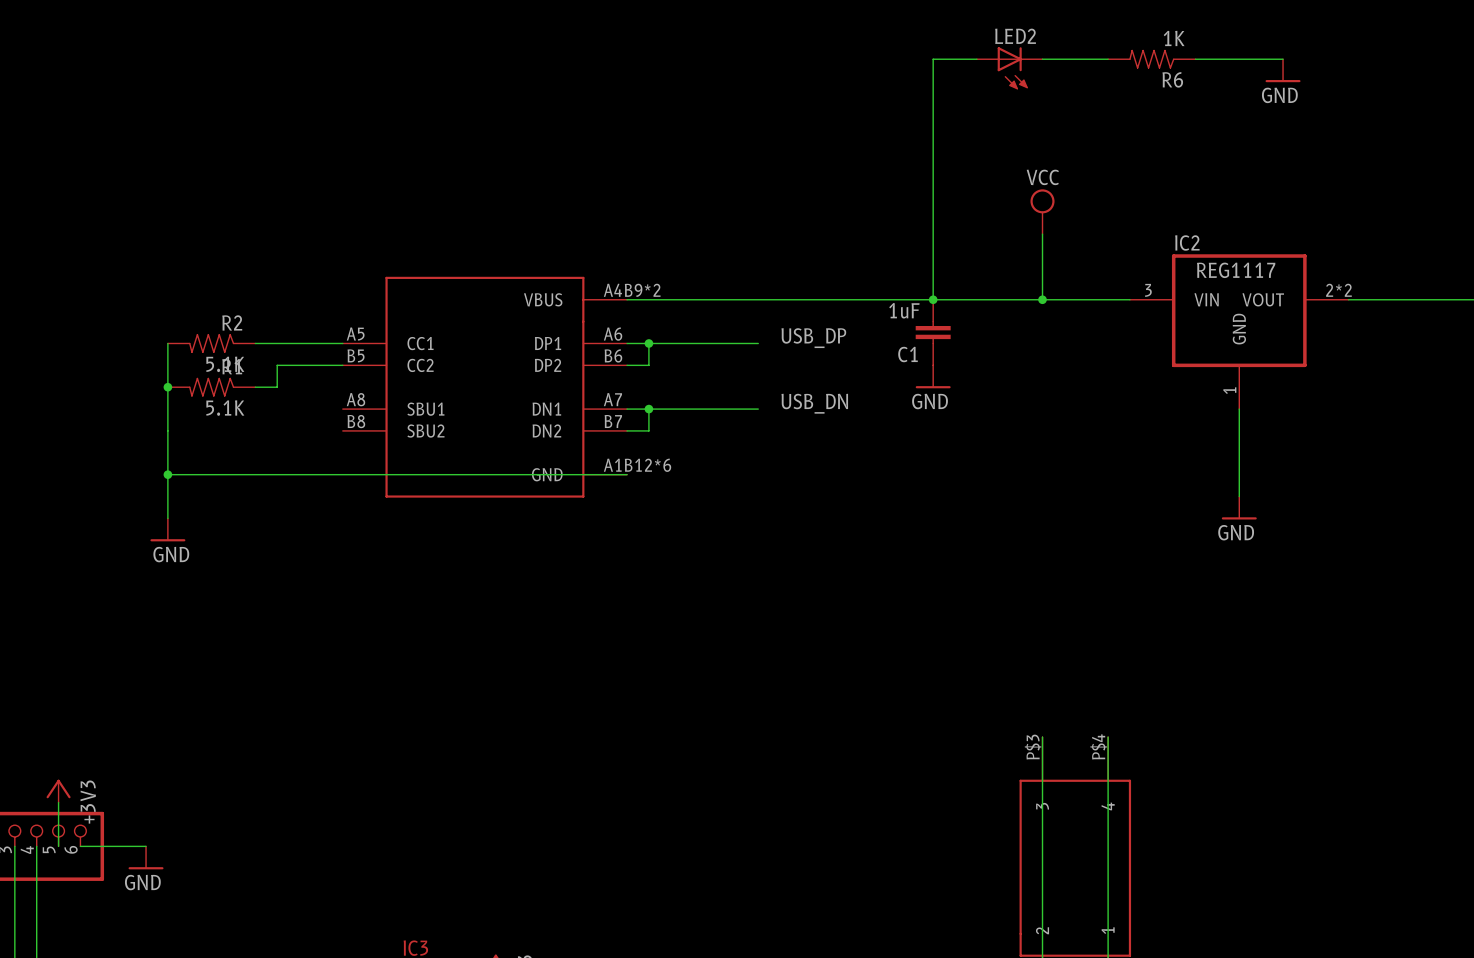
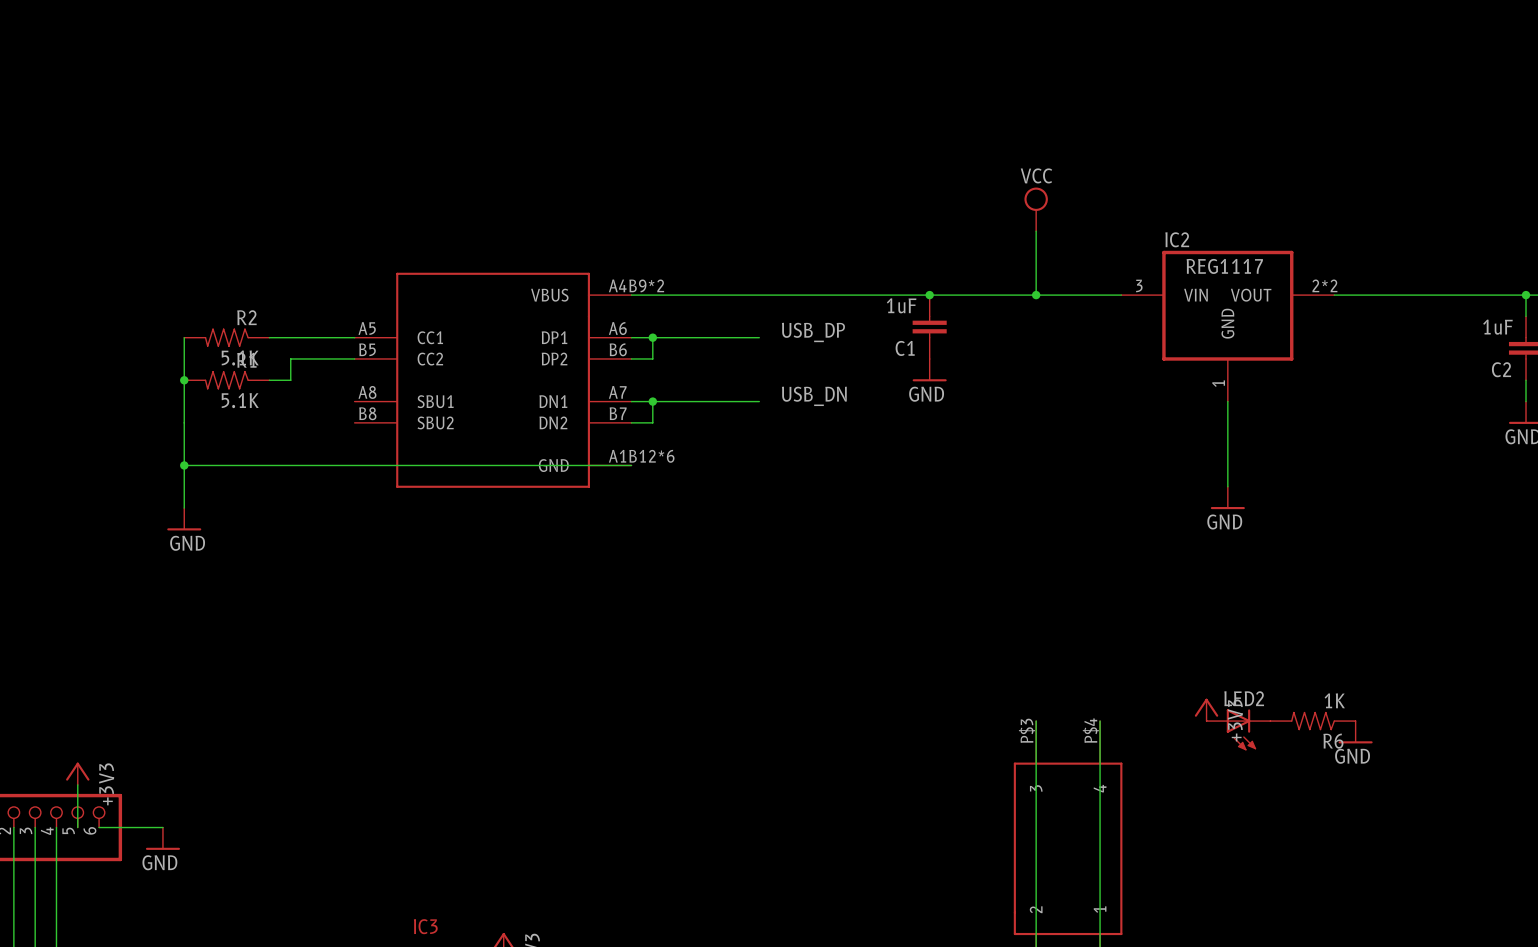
wire: (976, 59) (933, 59) (933, 299) -> none
wire: (1042, 59) (1108, 59) -> none
R6 position: (1151, 59) -> (1313, 721)
wire: (1195, 59) (1283, 59) -> none
LED2 position: (1009, 68) -> (1238, 729)
power symbol: GND (1283, 70) -> none
power symbol: none -> +3V3 (1206, 709)
power symbol: none -> GND (1355, 732)

